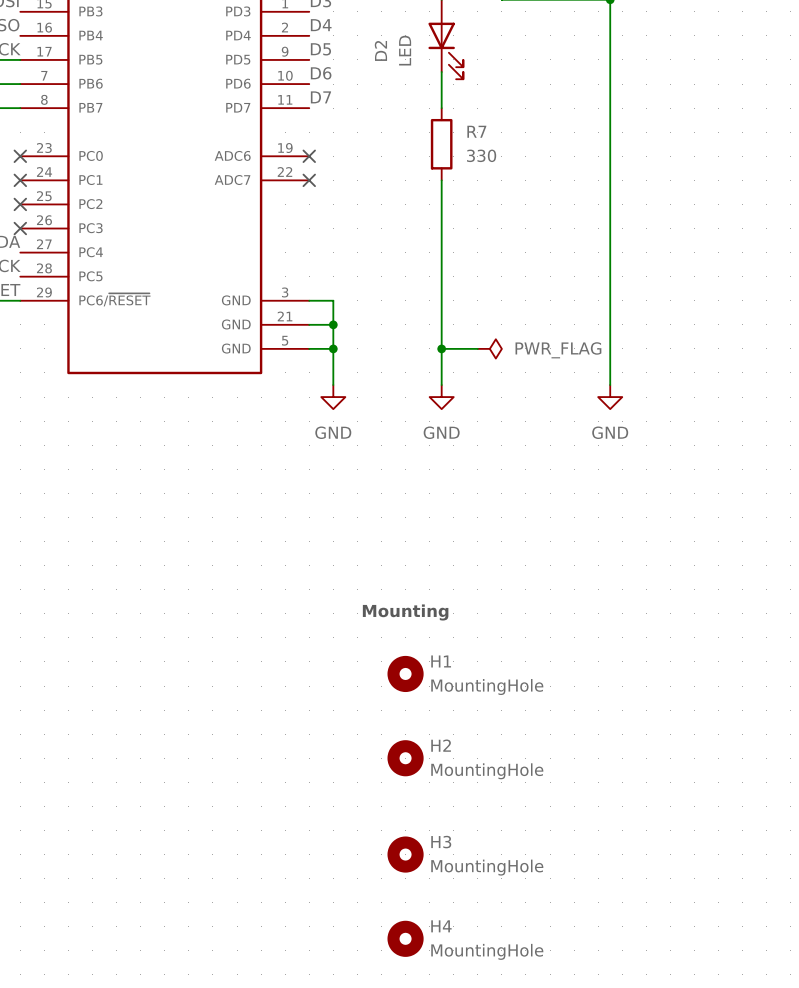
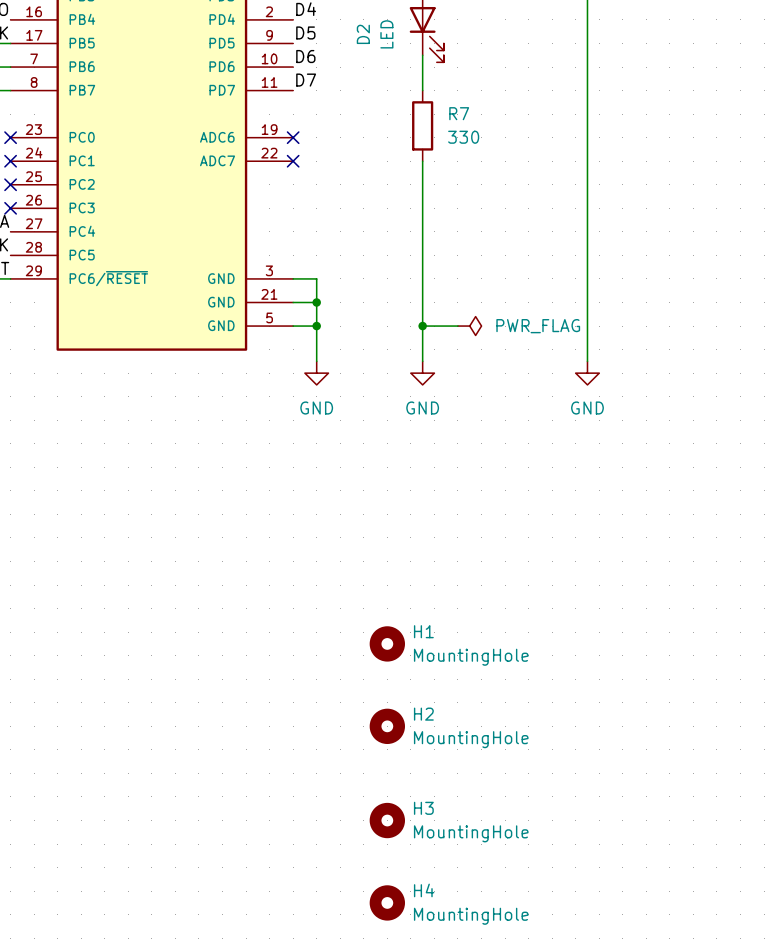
text: Mounting (405, 612) -> none

